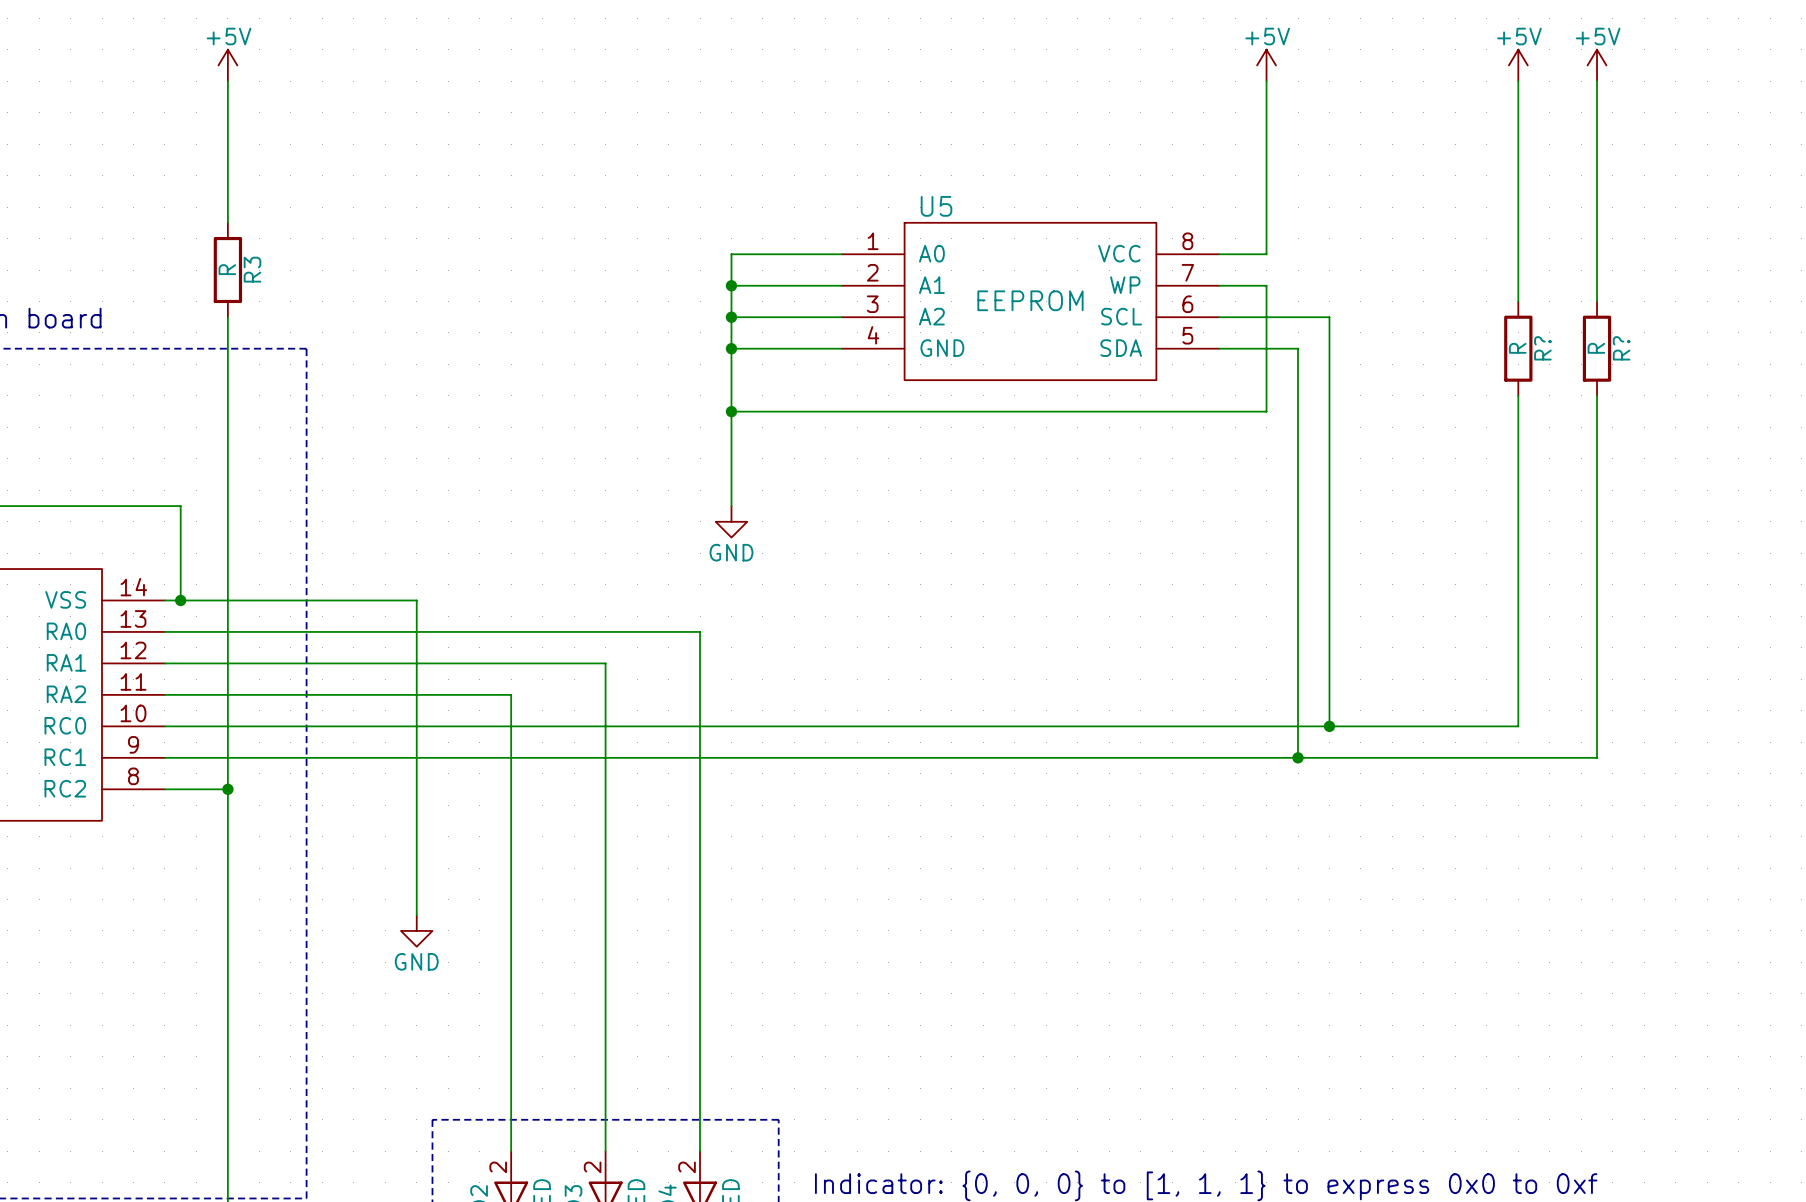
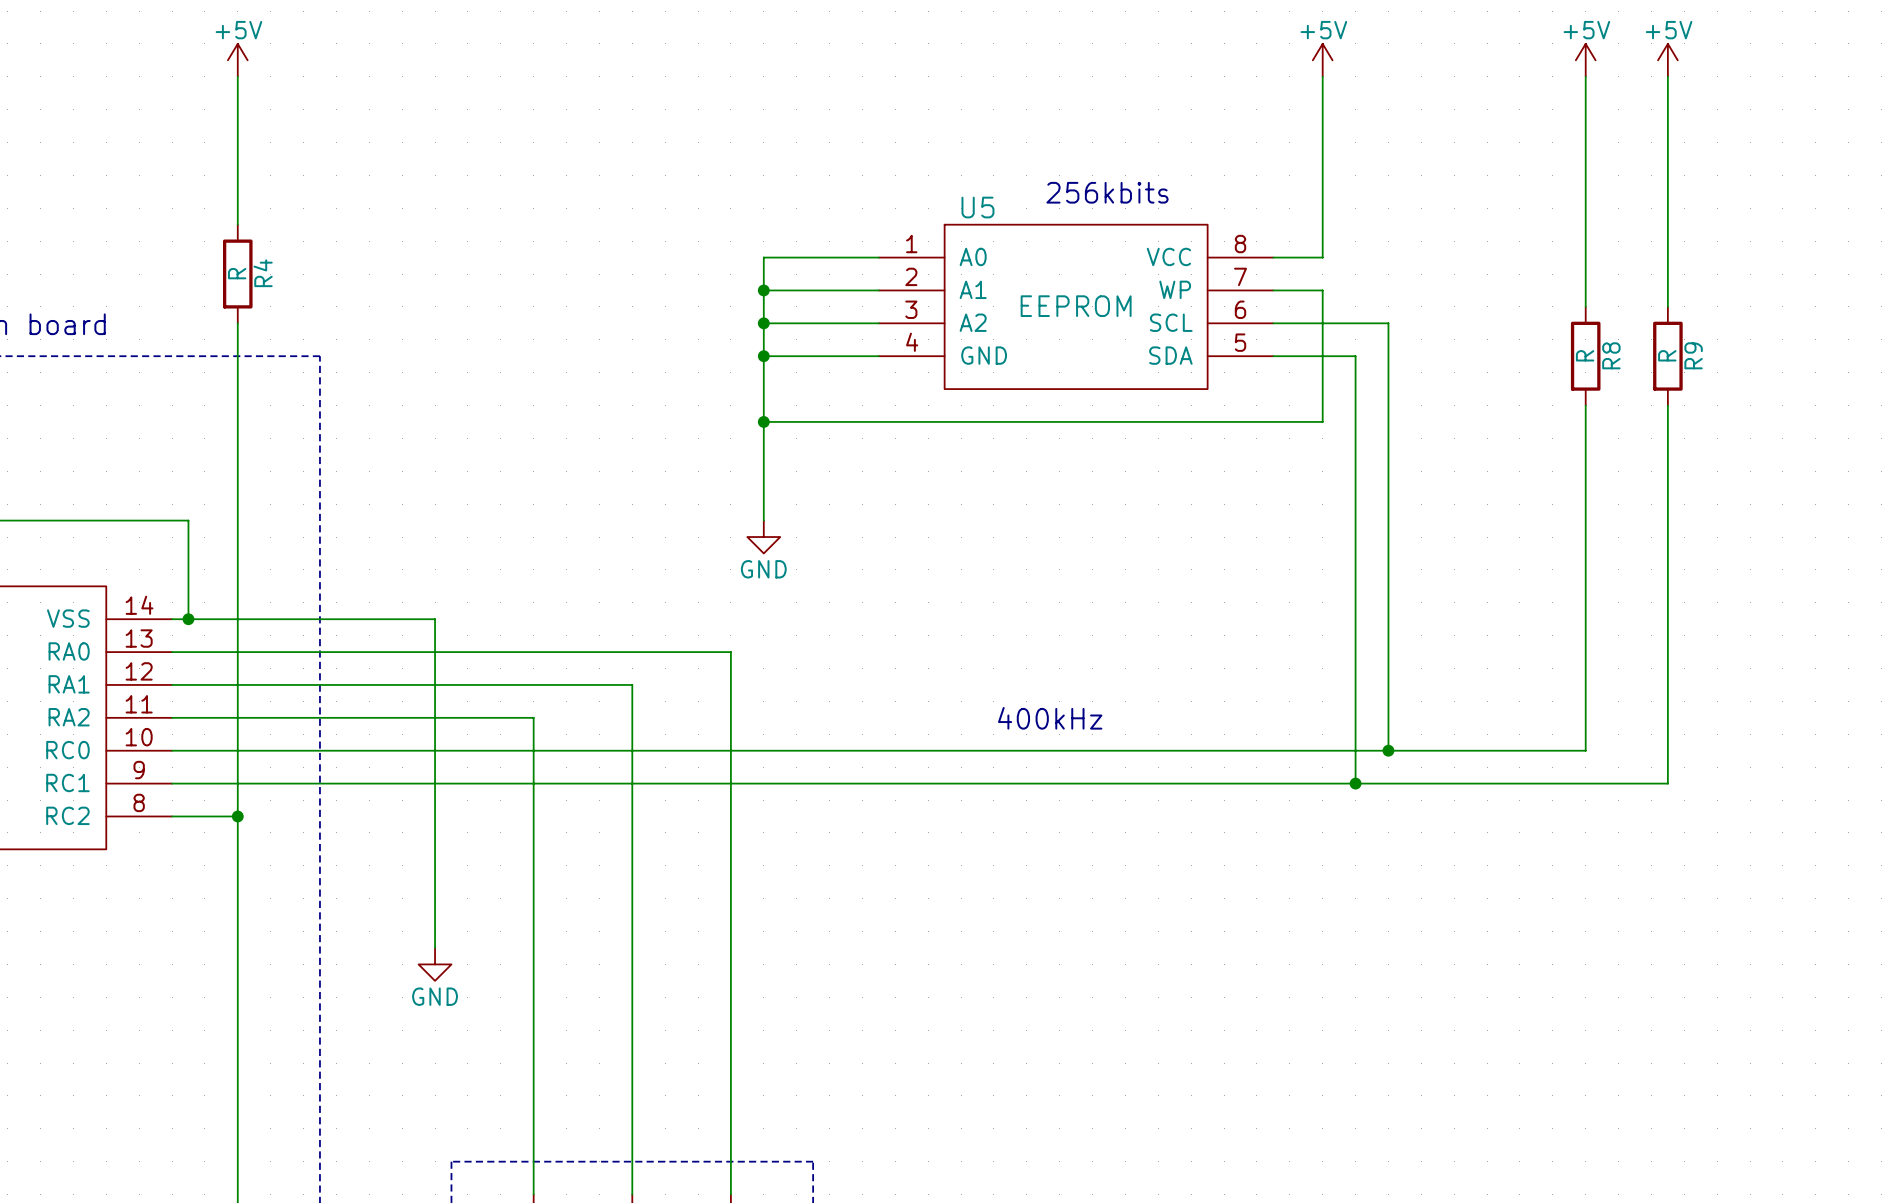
text: none -> 256kbits (1107, 192)
R3 name: R3 (252, 269) -> R4 (263, 273)
R? name: R? (1542, 348) -> R8 (1611, 355)
R? name: R? (1621, 348) -> R9 (1693, 355)
text: none -> 400kHz (1050, 718)

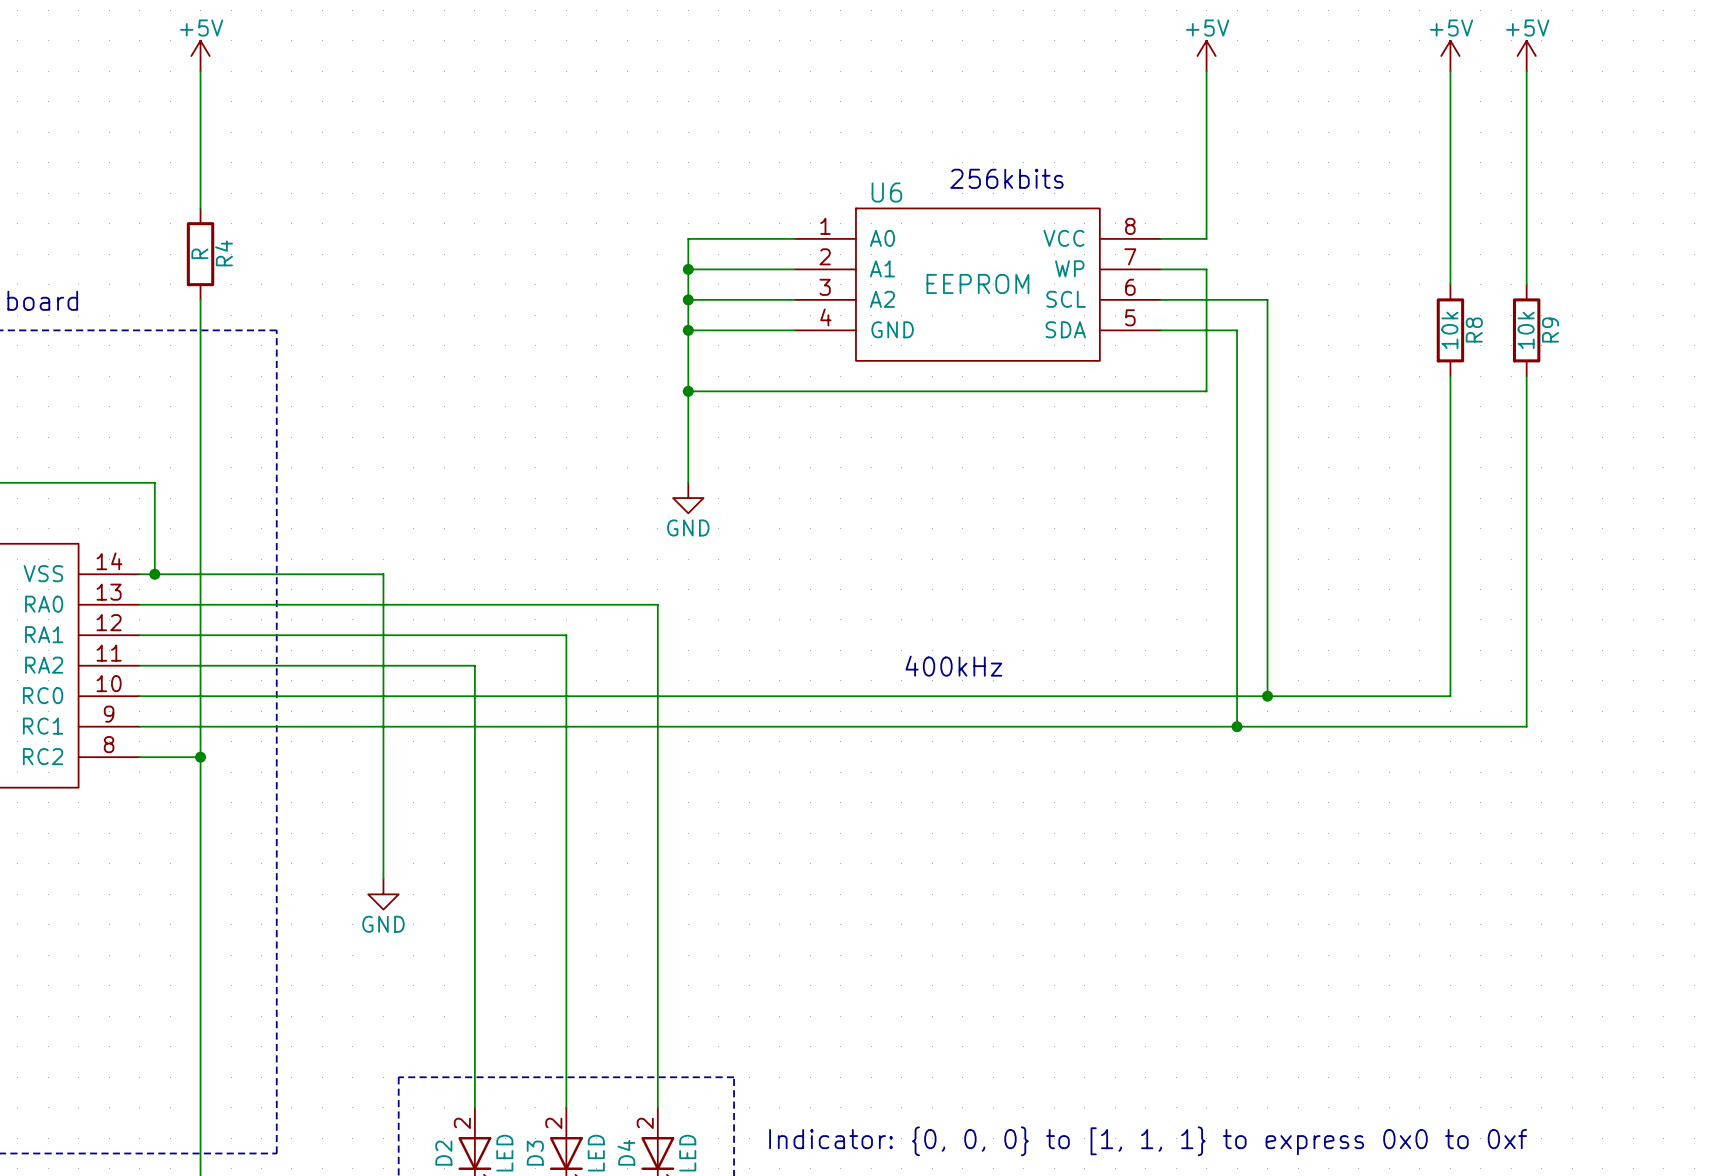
U5 name: U5 (977, 207) -> U6 (886, 192)
R8 value: R (1585, 355) -> 10k (1449, 330)
R9 value: R (1667, 355) -> 10k (1526, 330)

